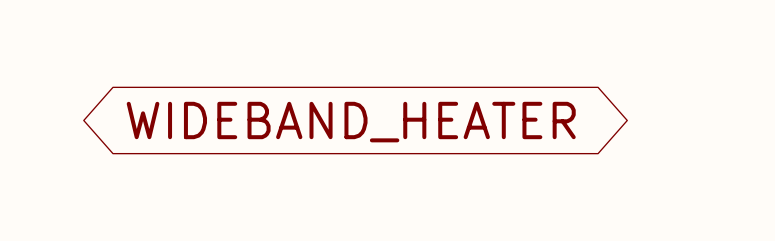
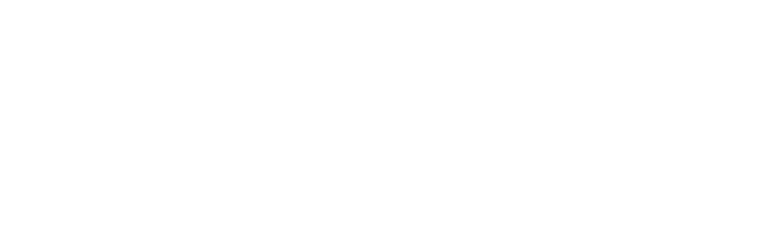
global label: WIDEBAND_HEATER (351, 122) -> none

